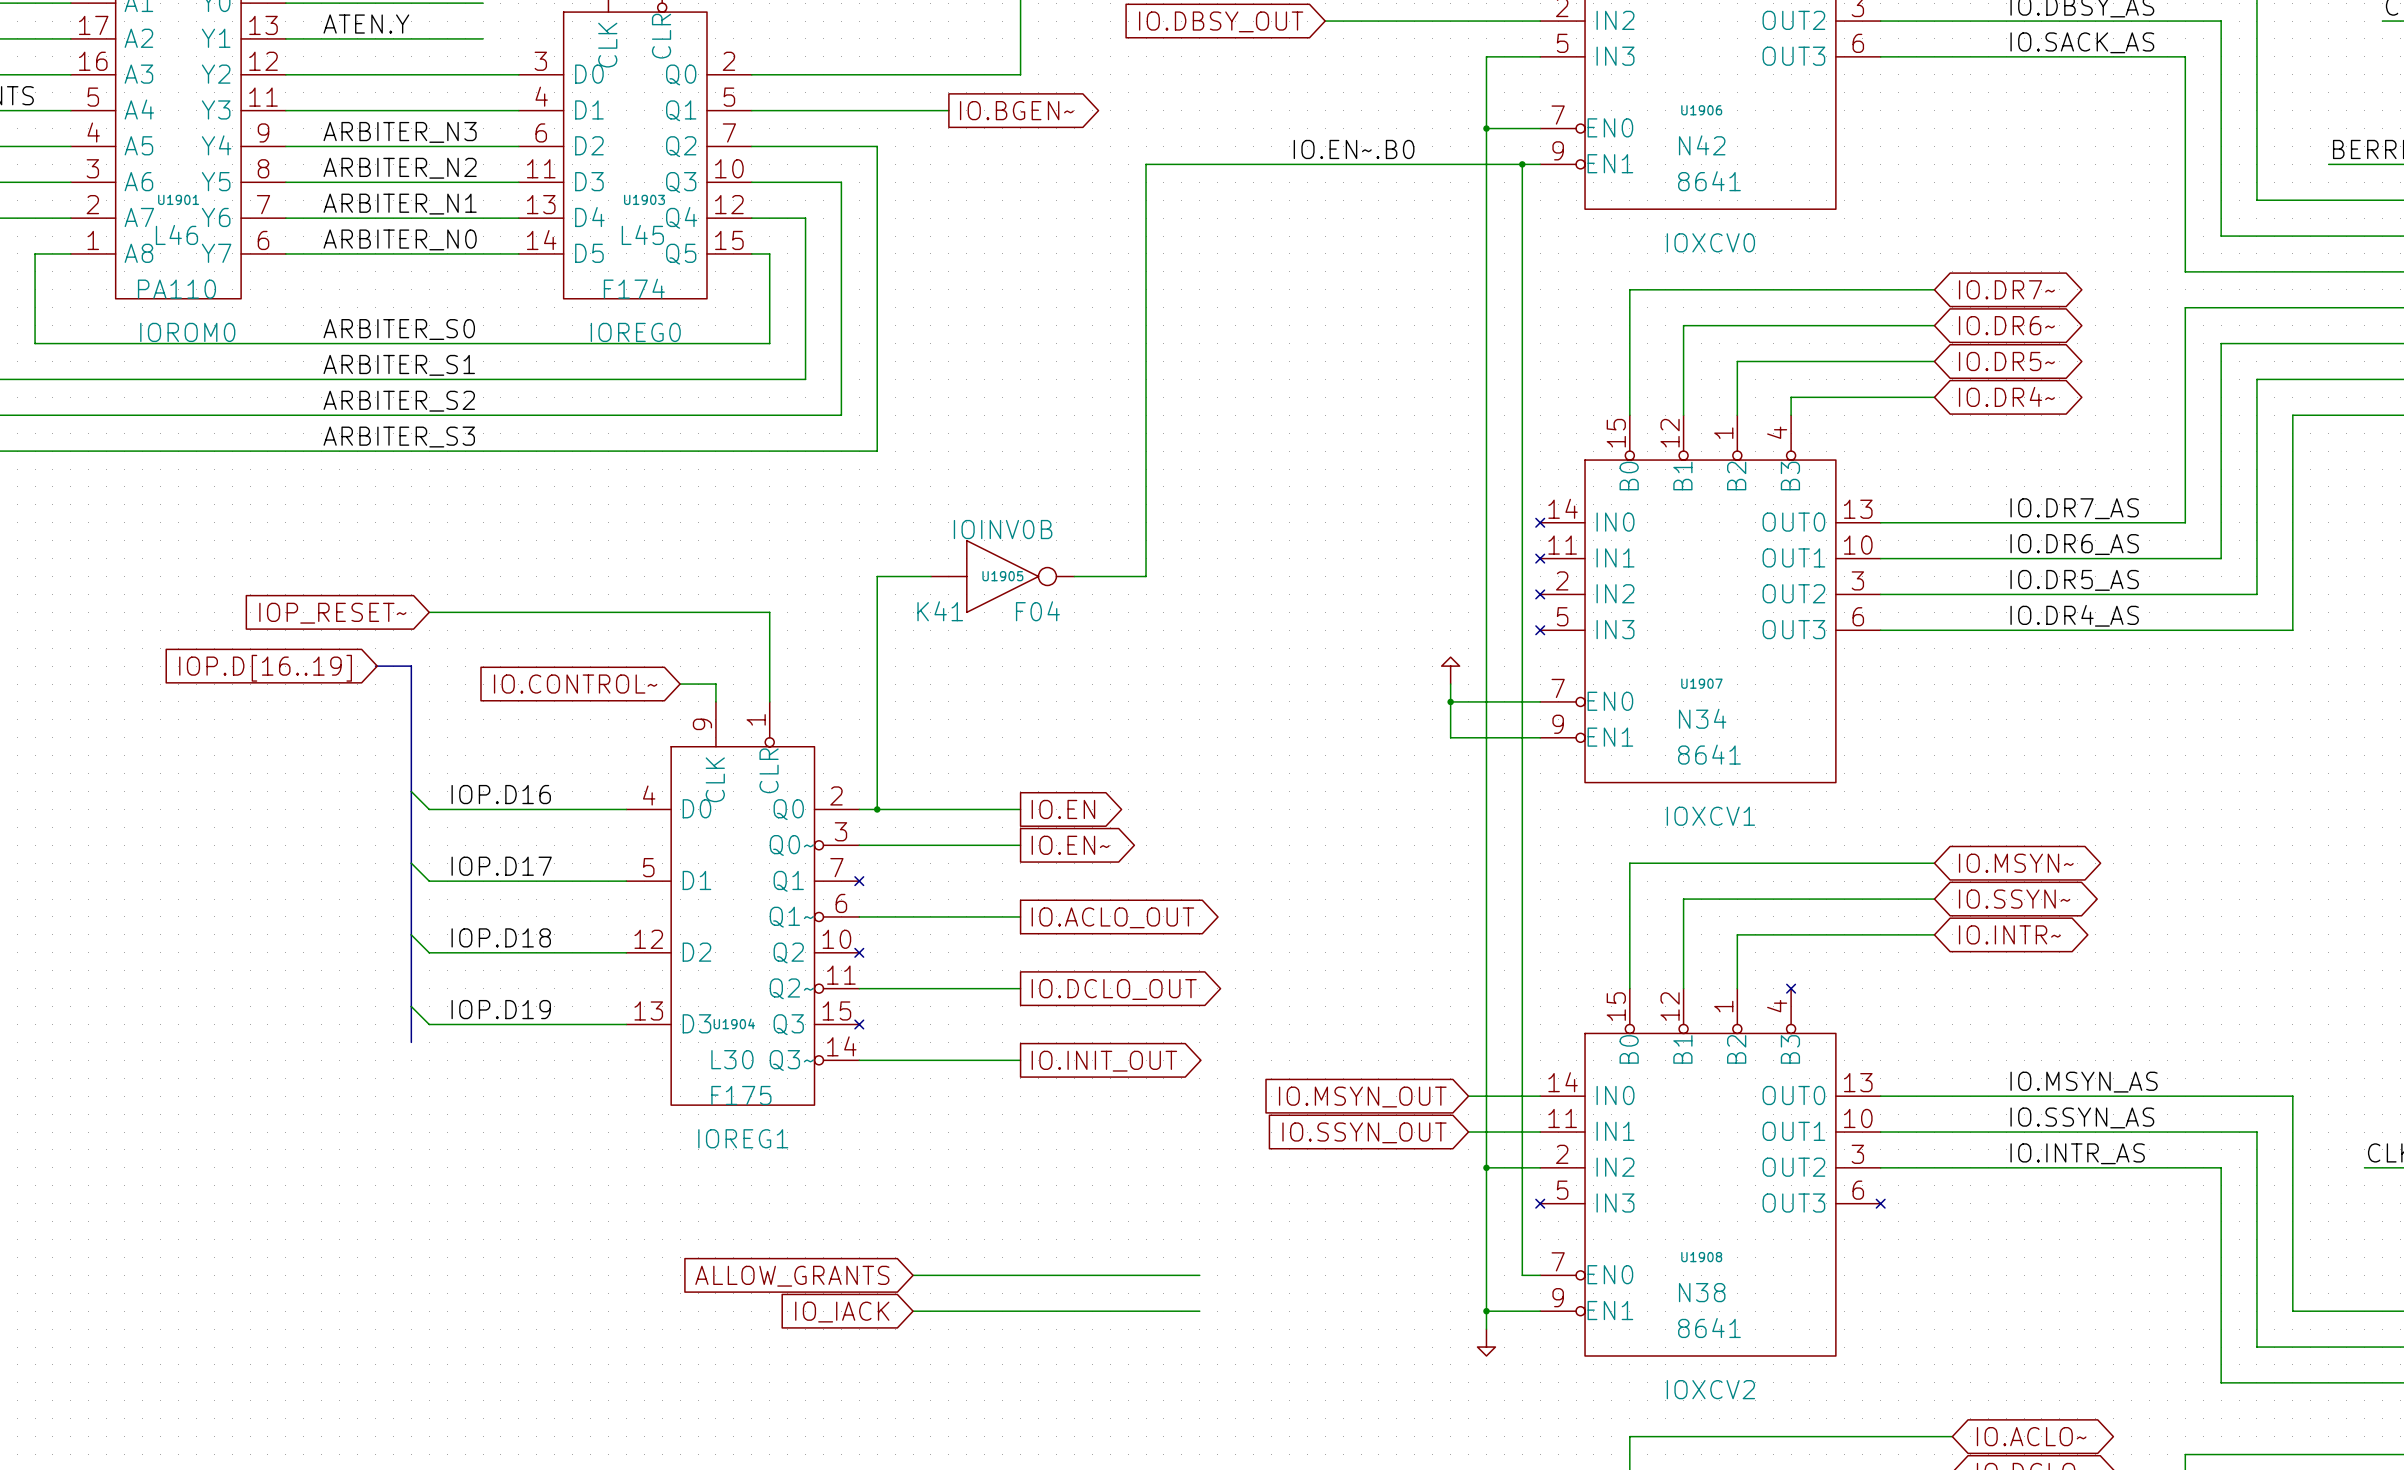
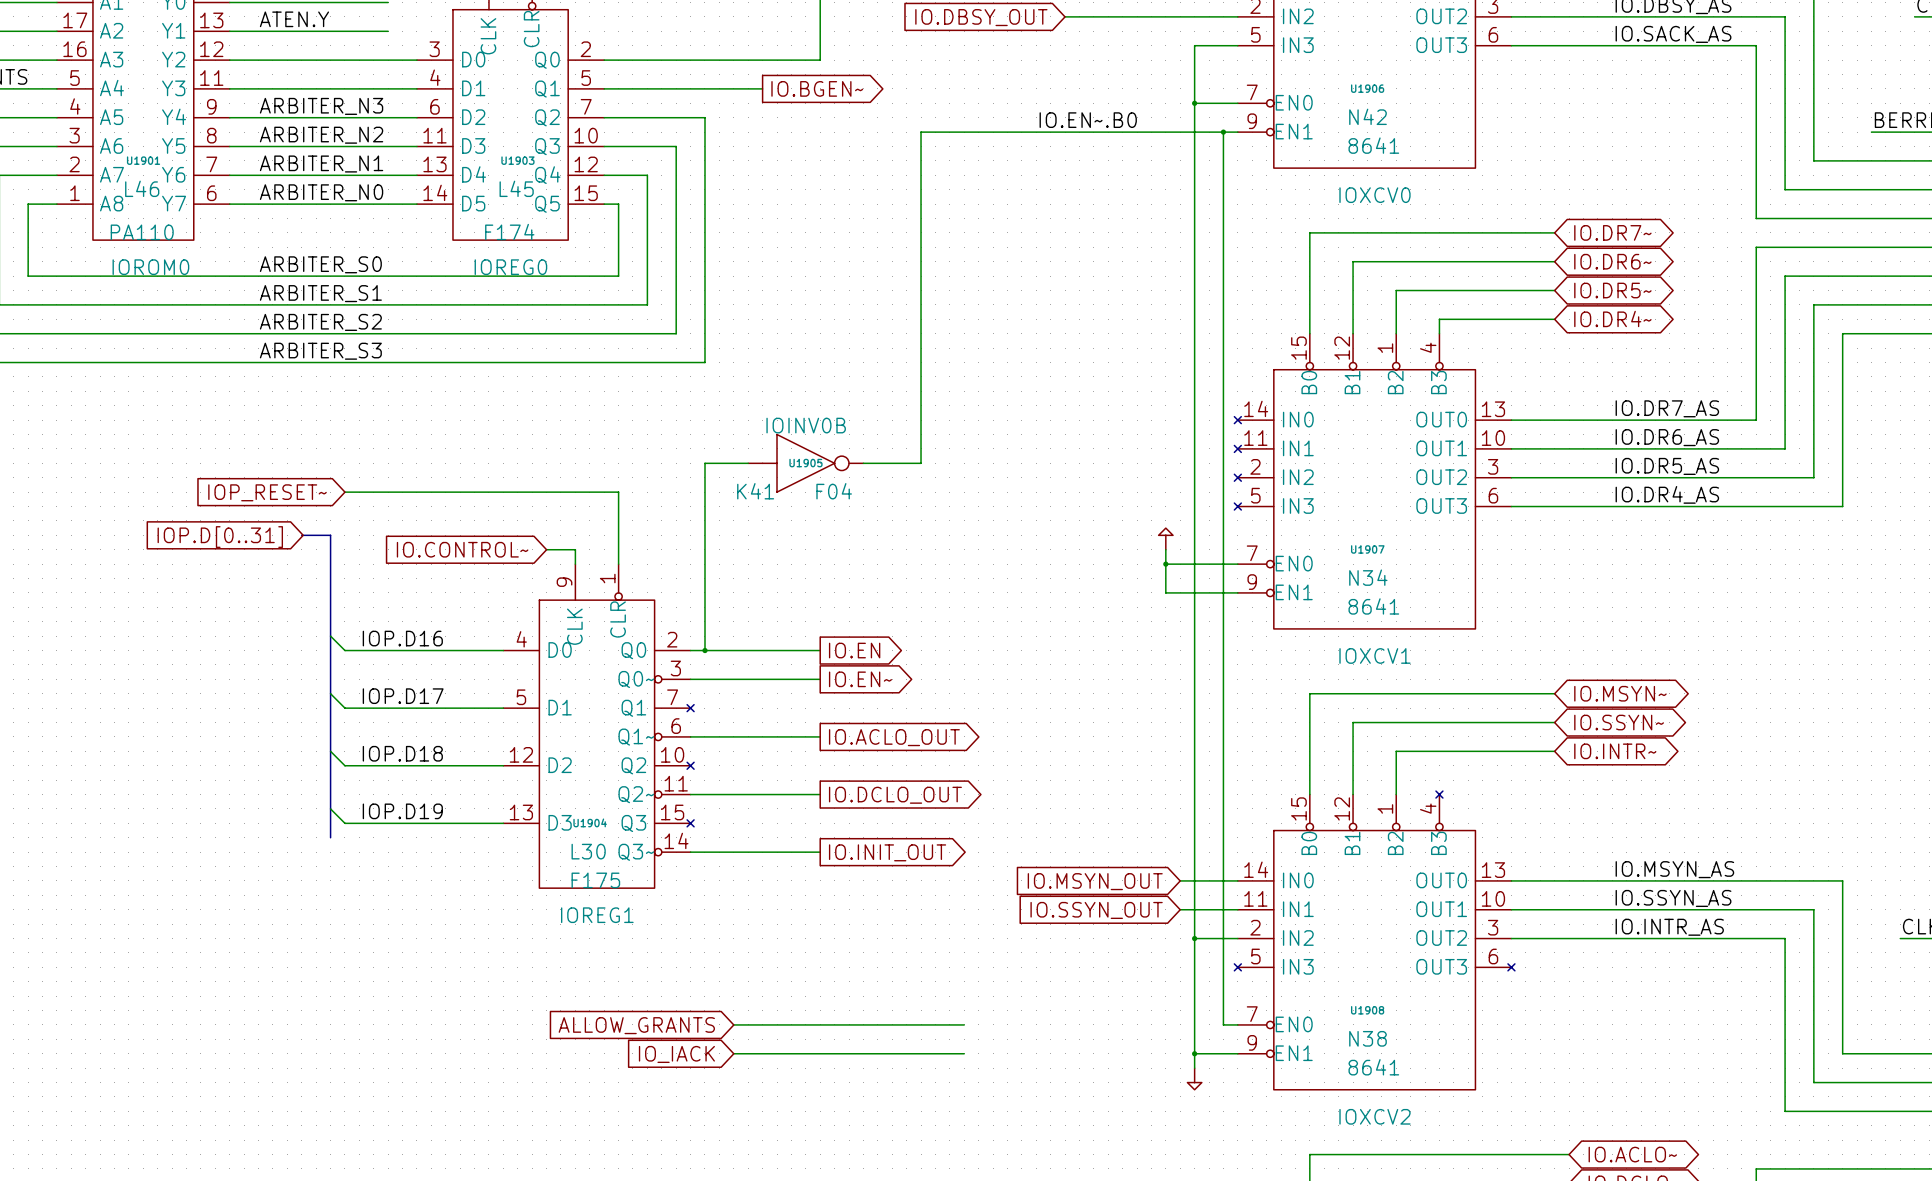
global label: IOP.D[16..19] (265, 668) -> IOP.D[0..31] (220, 537)

